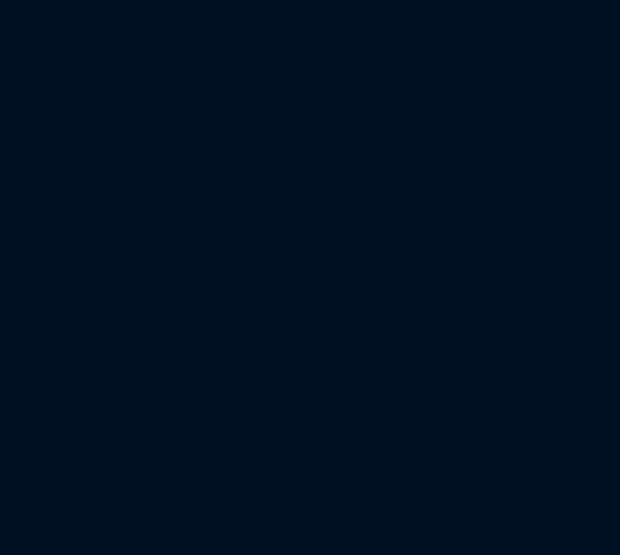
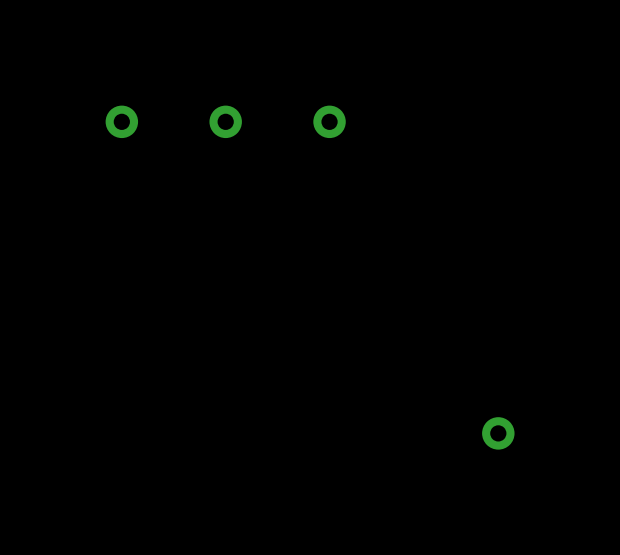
part: none -> (121, 121)
part: none -> (225, 121)
part: none -> (329, 121)
part: none -> (498, 433)

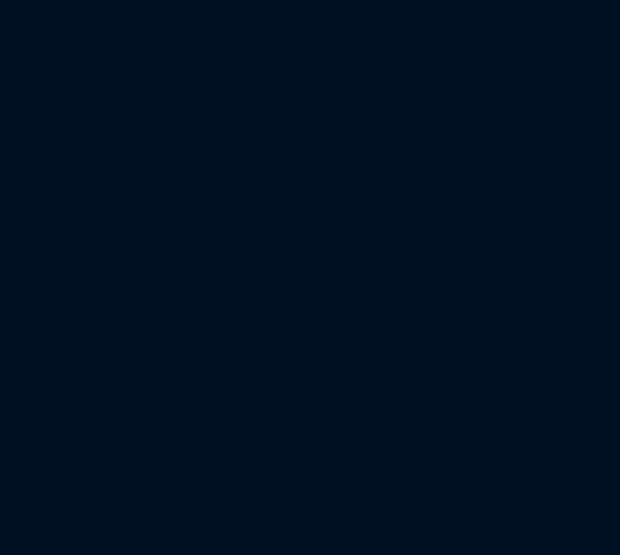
part: (121, 121) -> none
part: (225, 121) -> none
part: (329, 121) -> none
part: (498, 433) -> none

